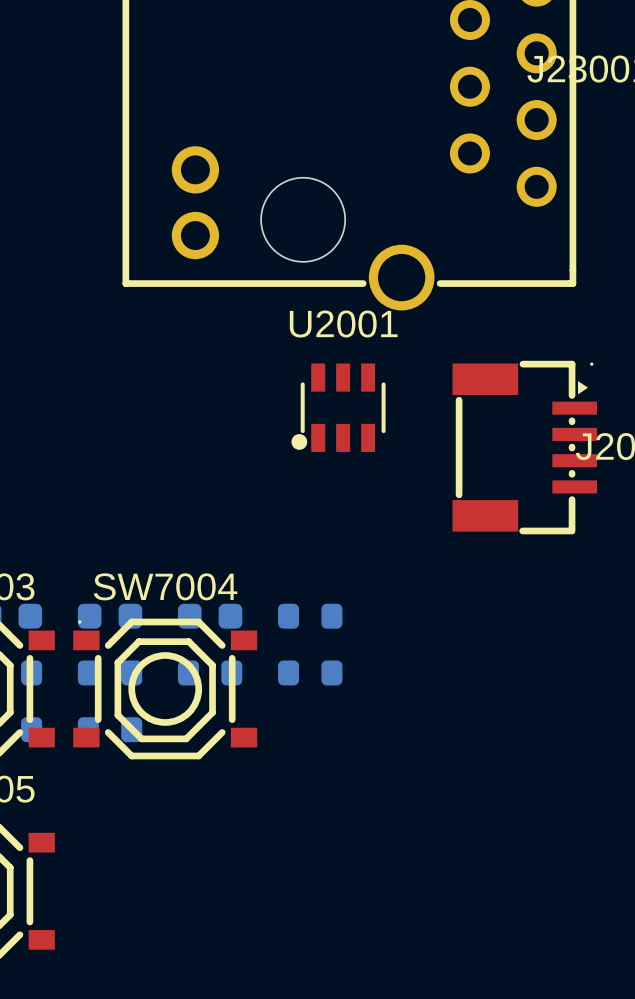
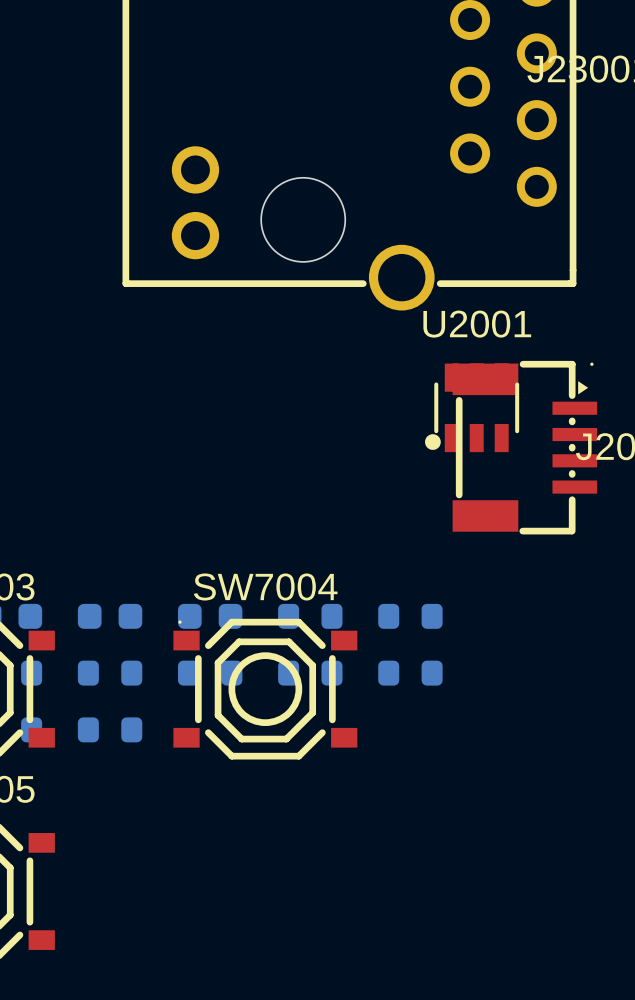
U2001 position: (338, 407) -> (472, 407)
part: none -> (410, 616)
part: none -> (410, 673)
SW7004 position: (165, 688) -> (265, 689)

